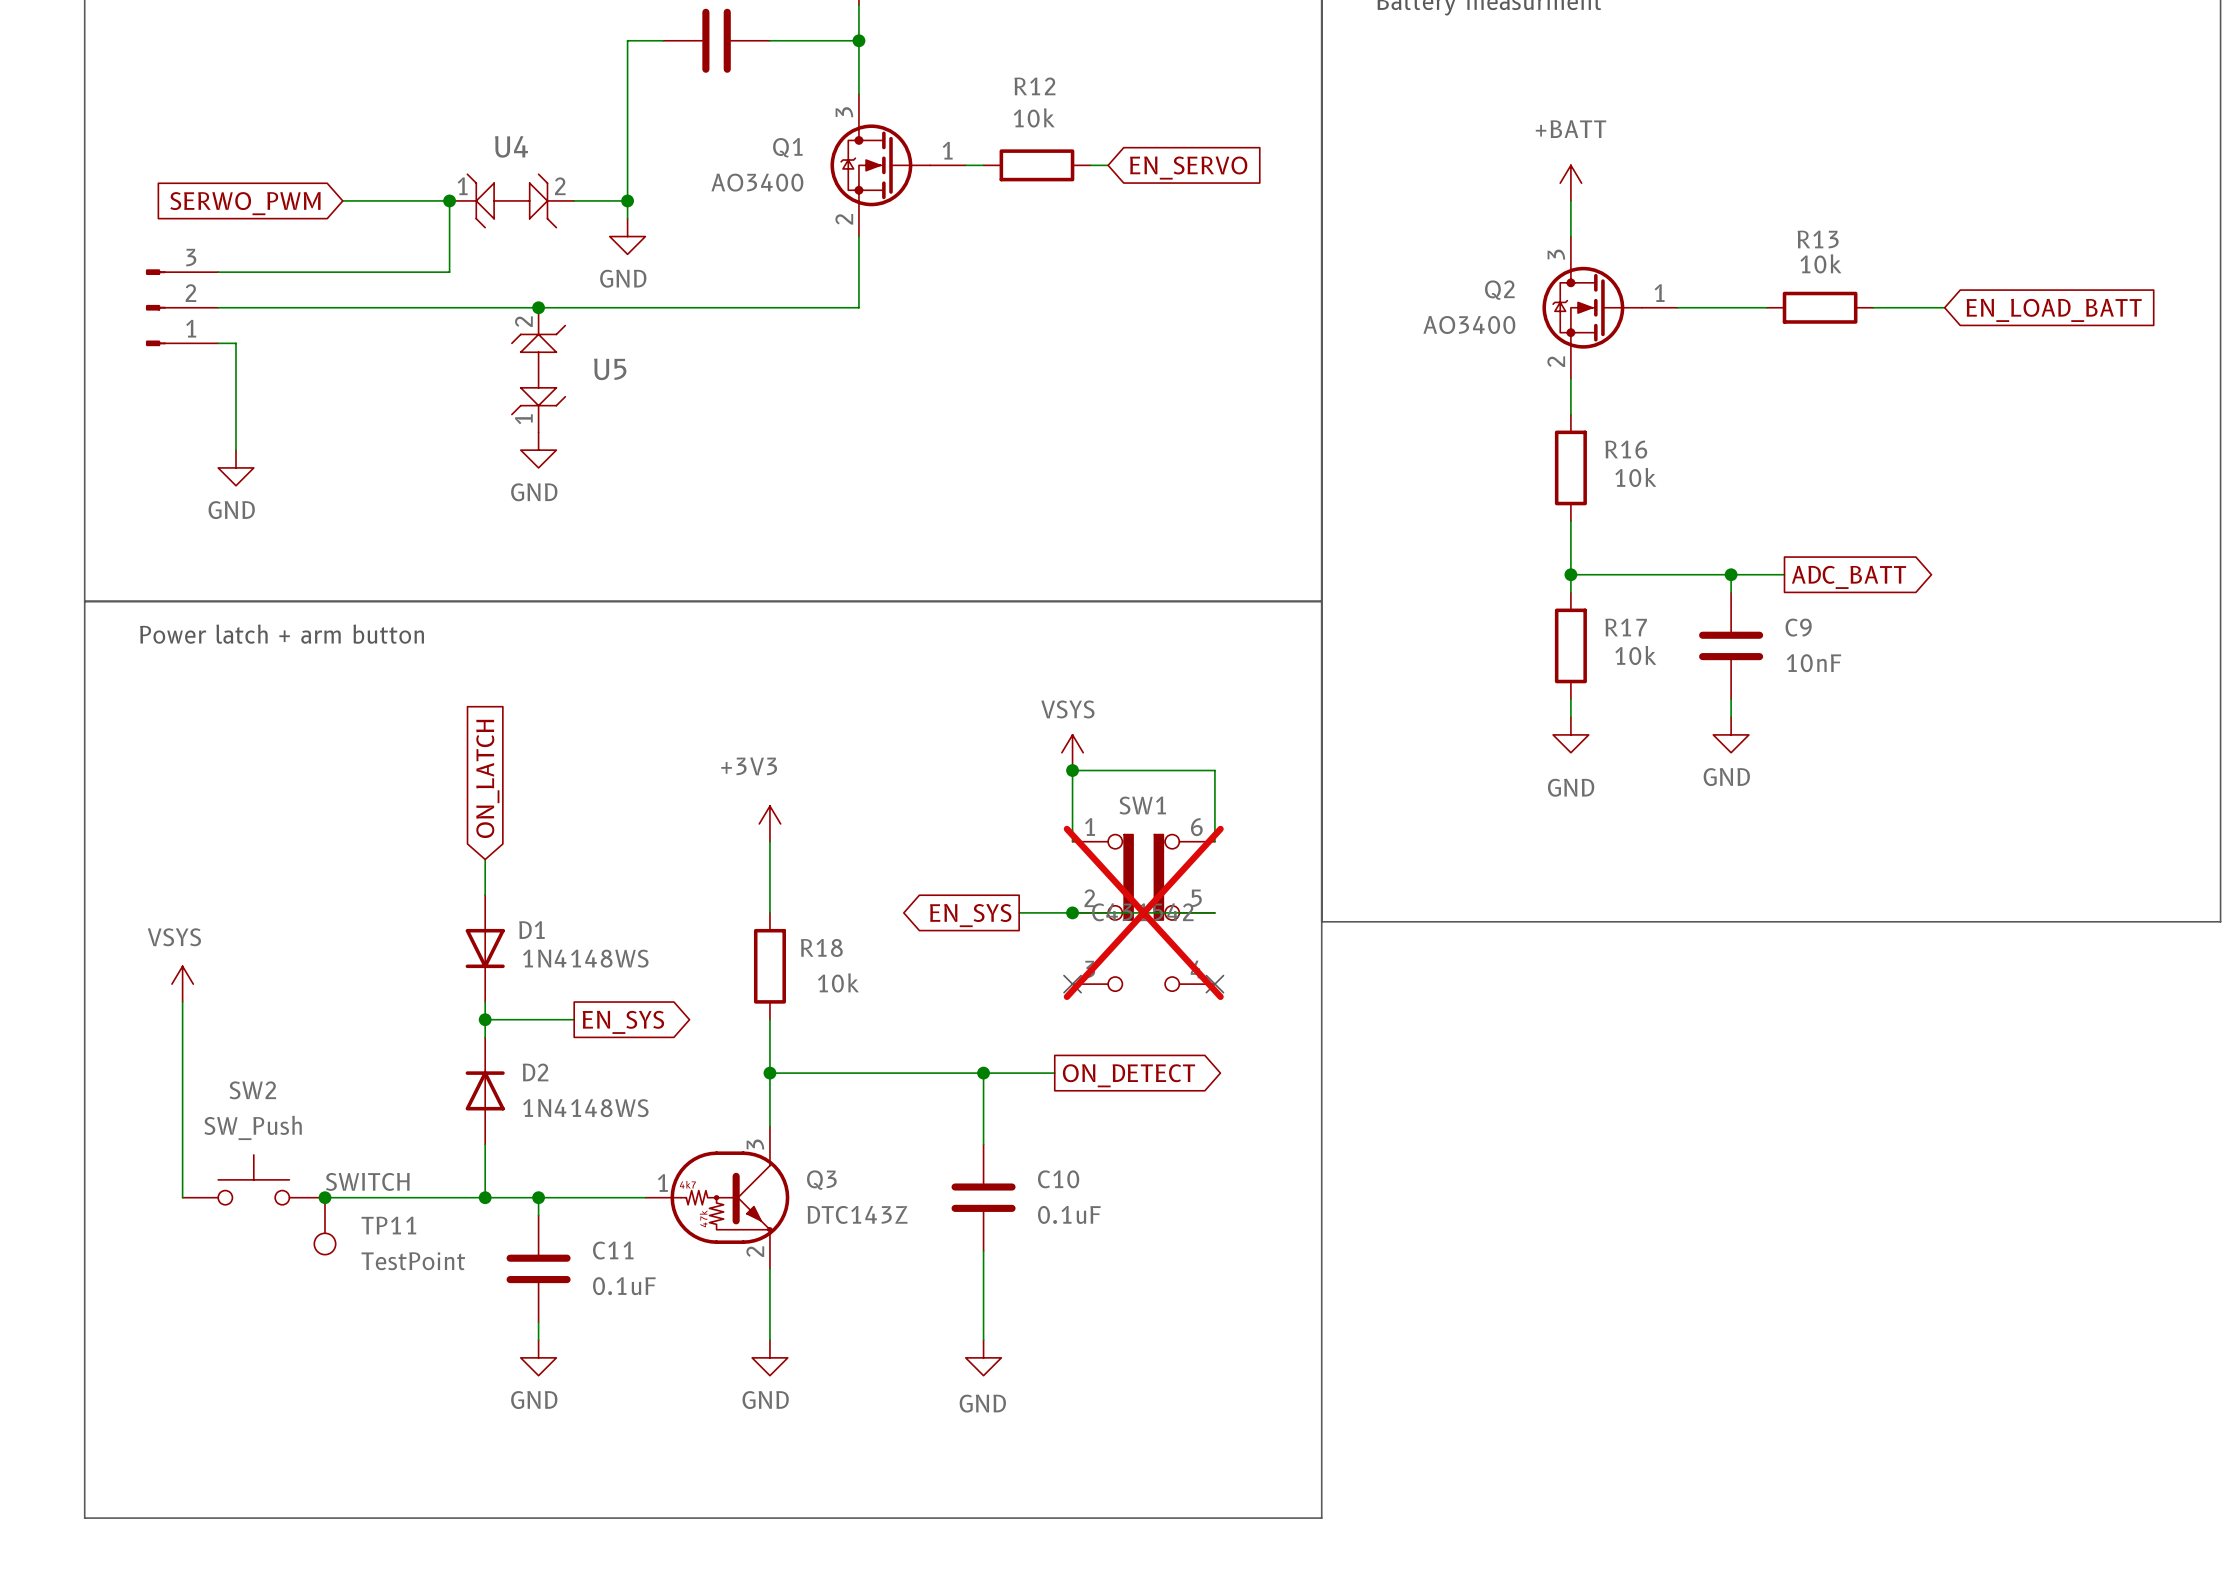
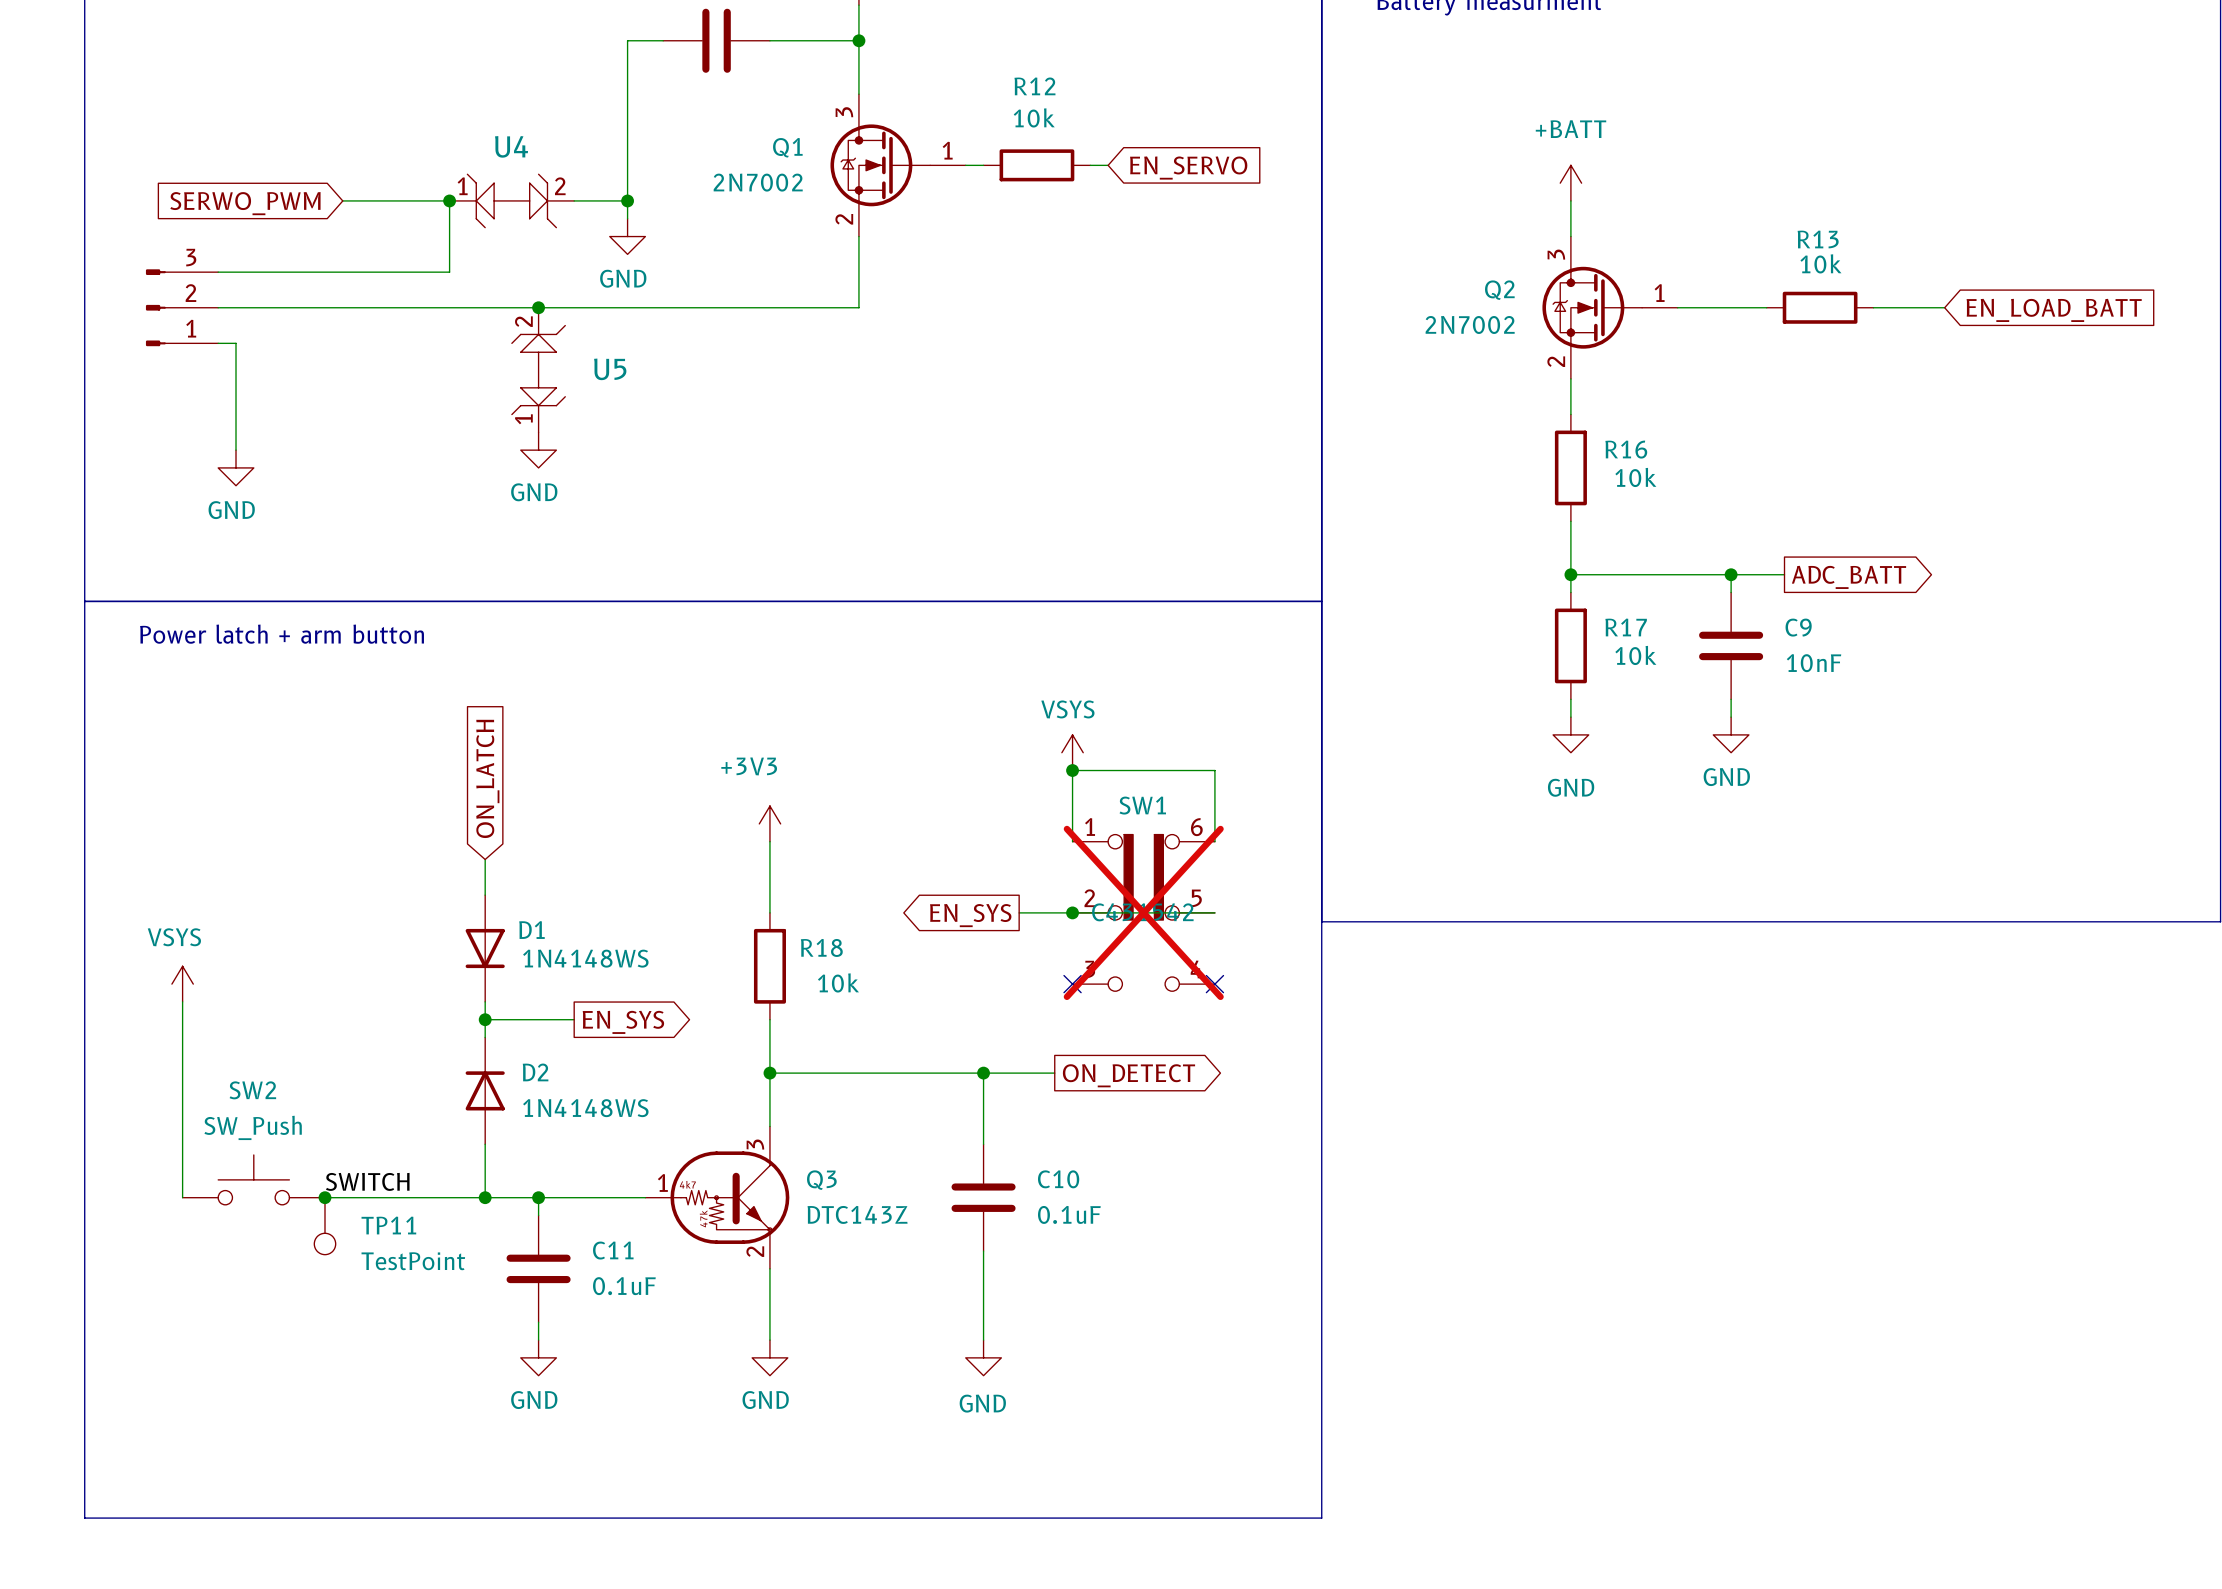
Q1 value: AO3400 (757, 182) -> 2N7002 (758, 182)
Q2 value: AO3400 (1469, 324) -> 2N7002 (1470, 324)

